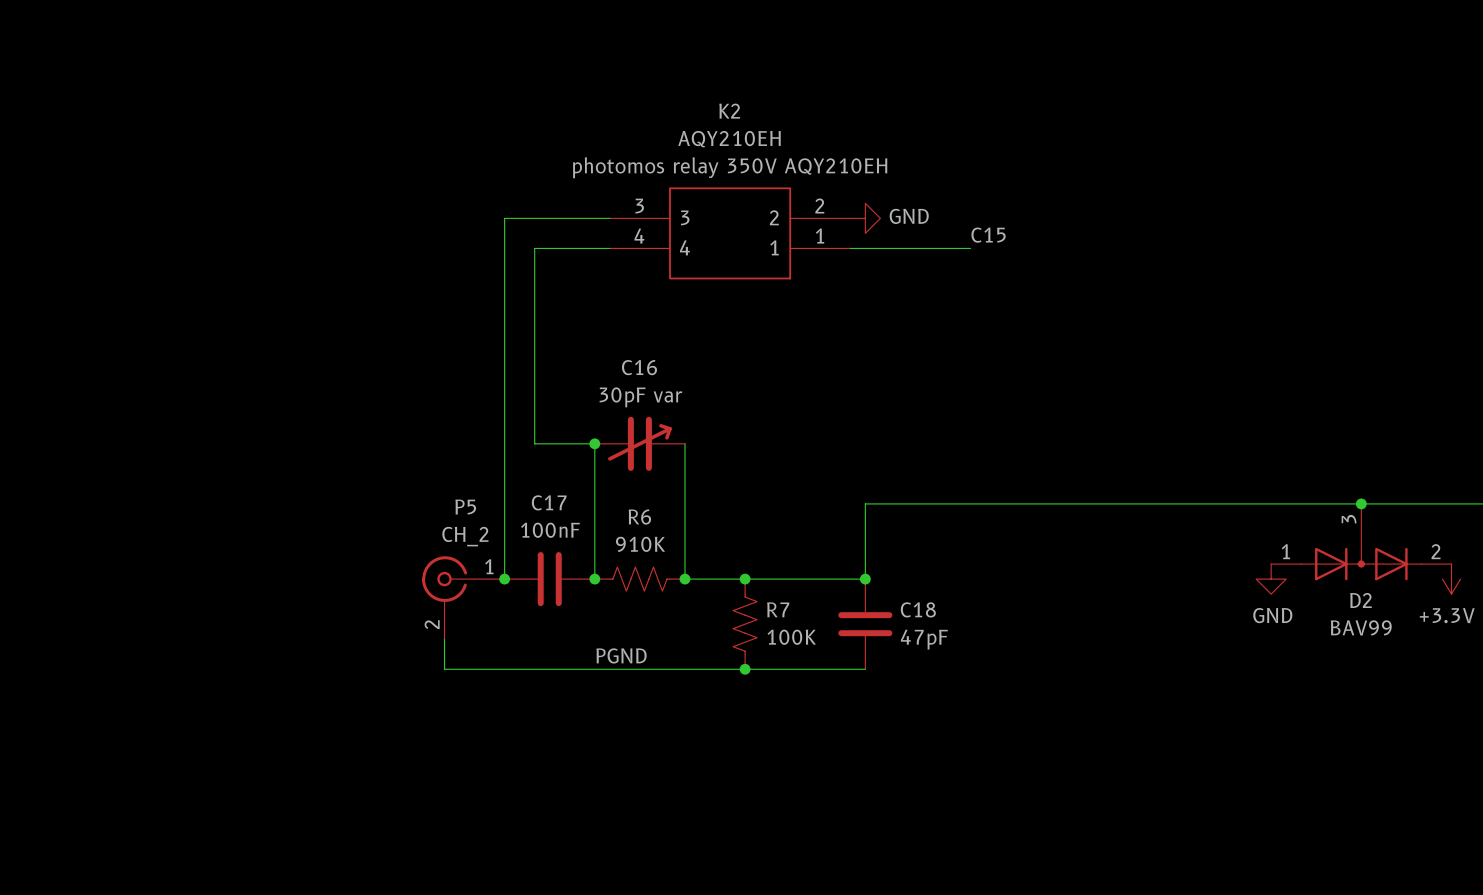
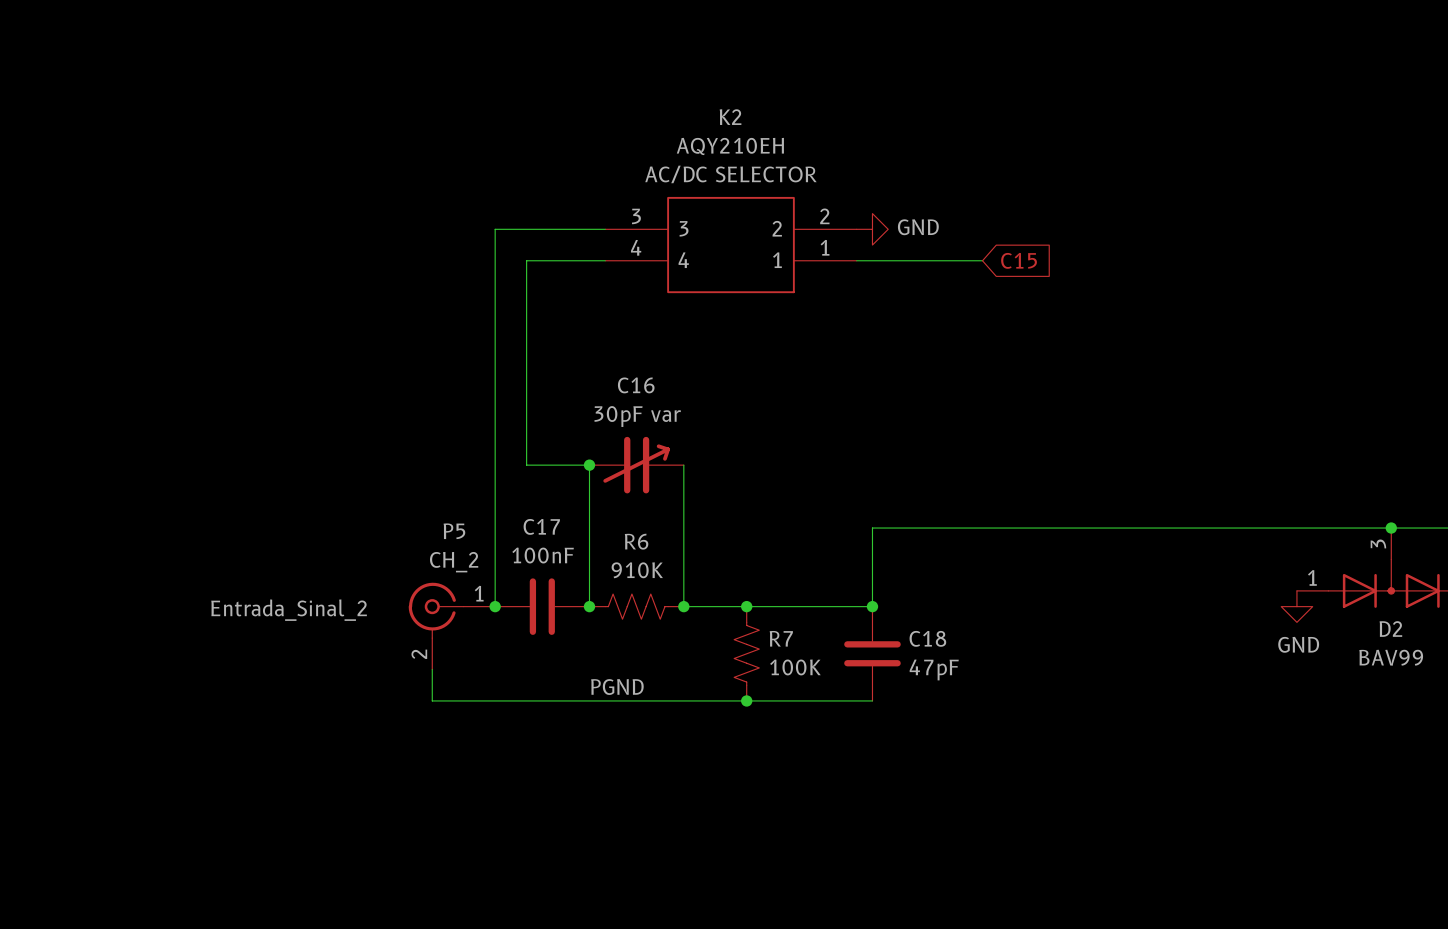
K2 text: photomos relay 350V AQY210EH (730, 167) -> AC/DC SELECTOR (730, 174)
label: C15 (988, 235) -> none
global label: none -> C15 (1019, 260)
label: none -> Entrada_Sinal_2 (289, 610)

